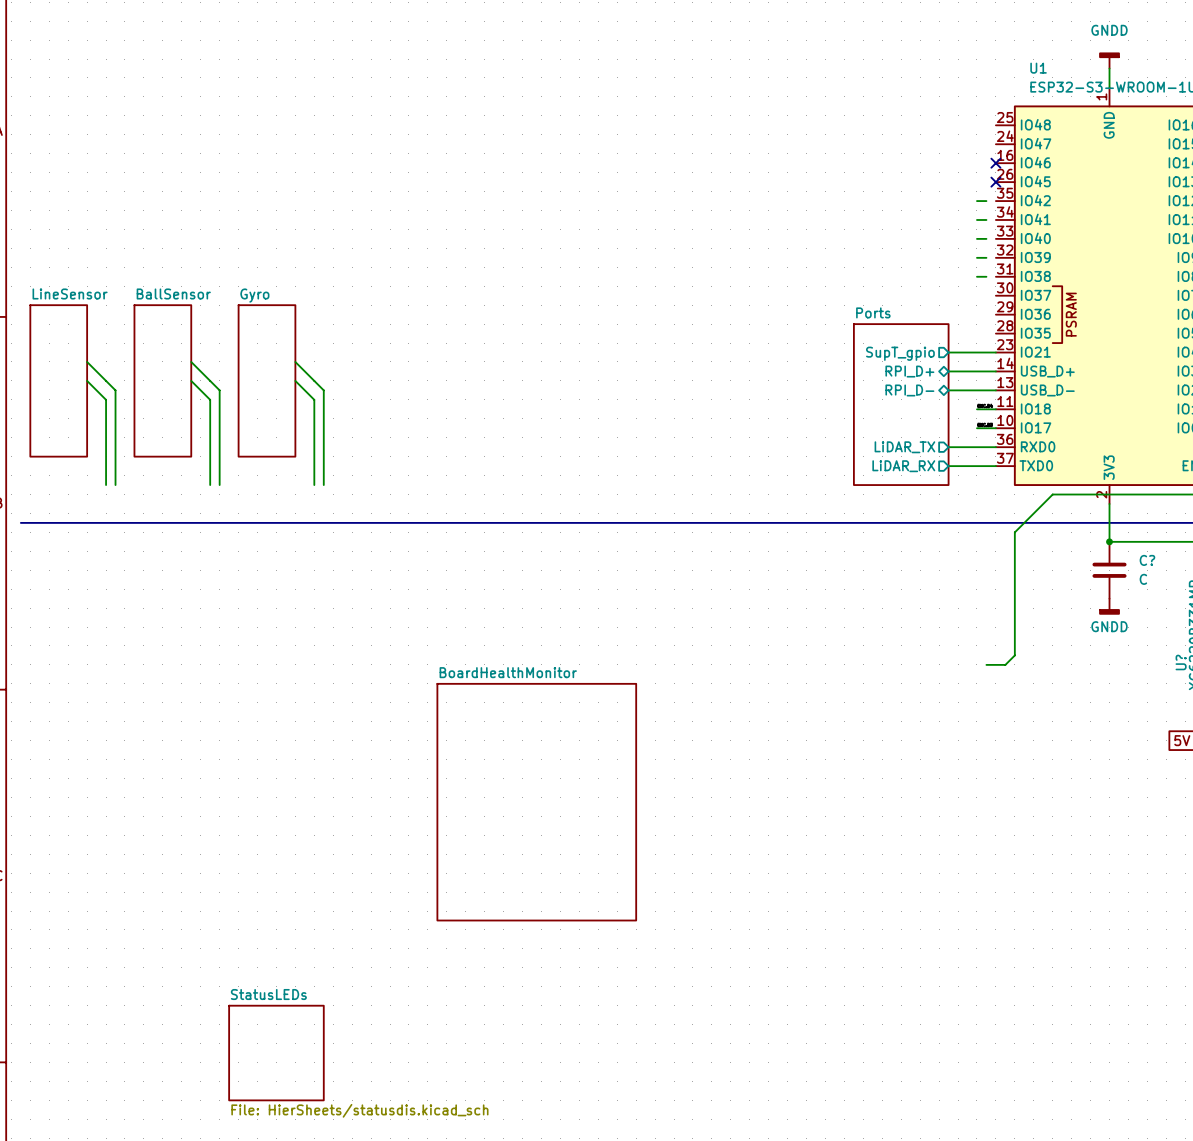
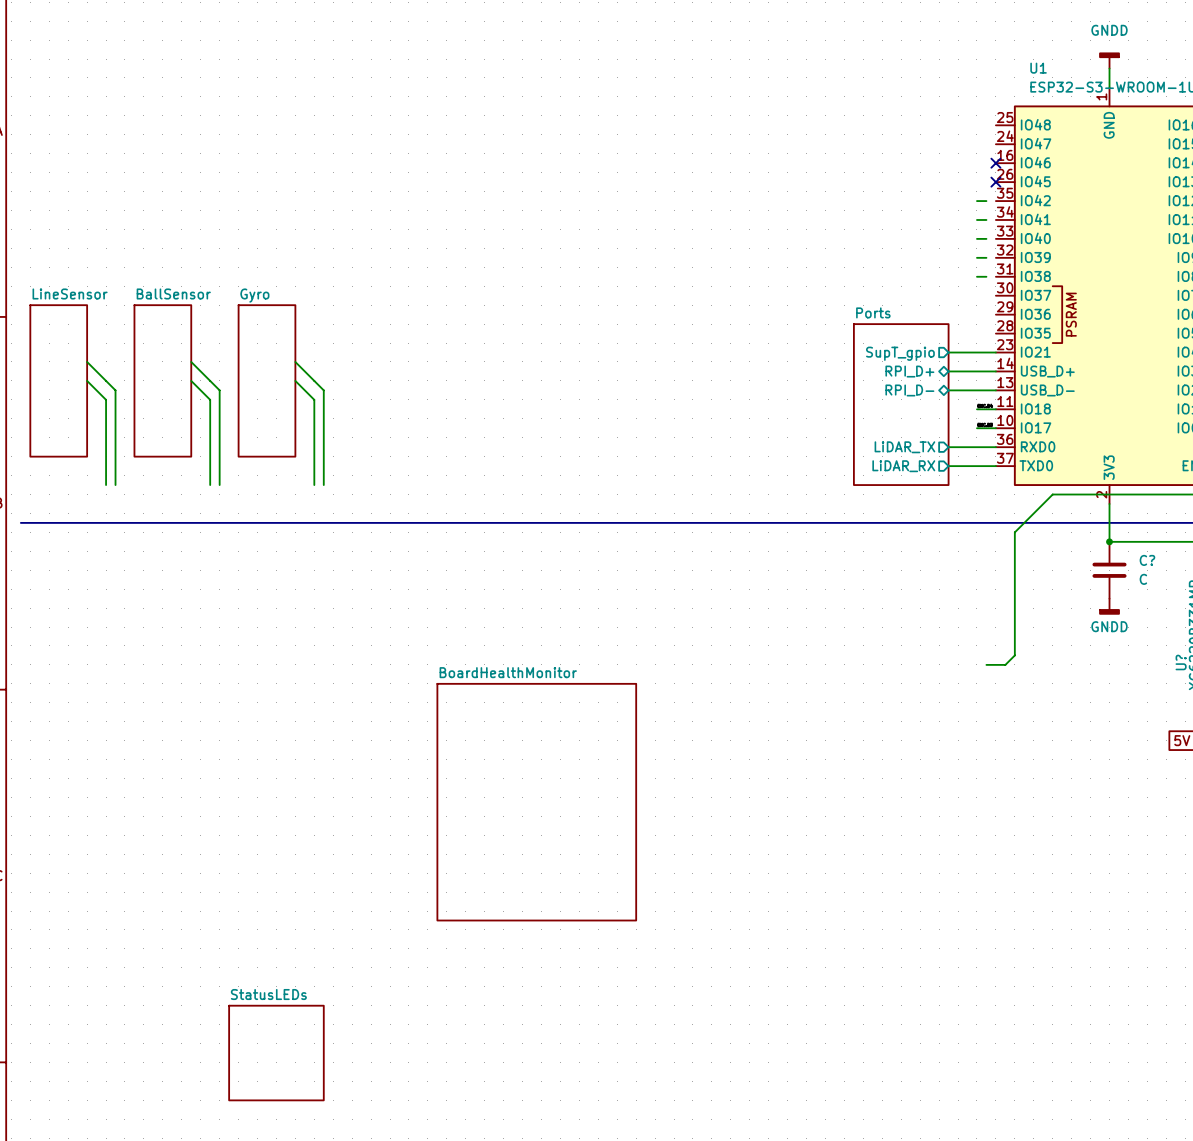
sheet StatusLEDs value: File: HierSheets/statusdis.kicad_sch (359, 1110) -> none

